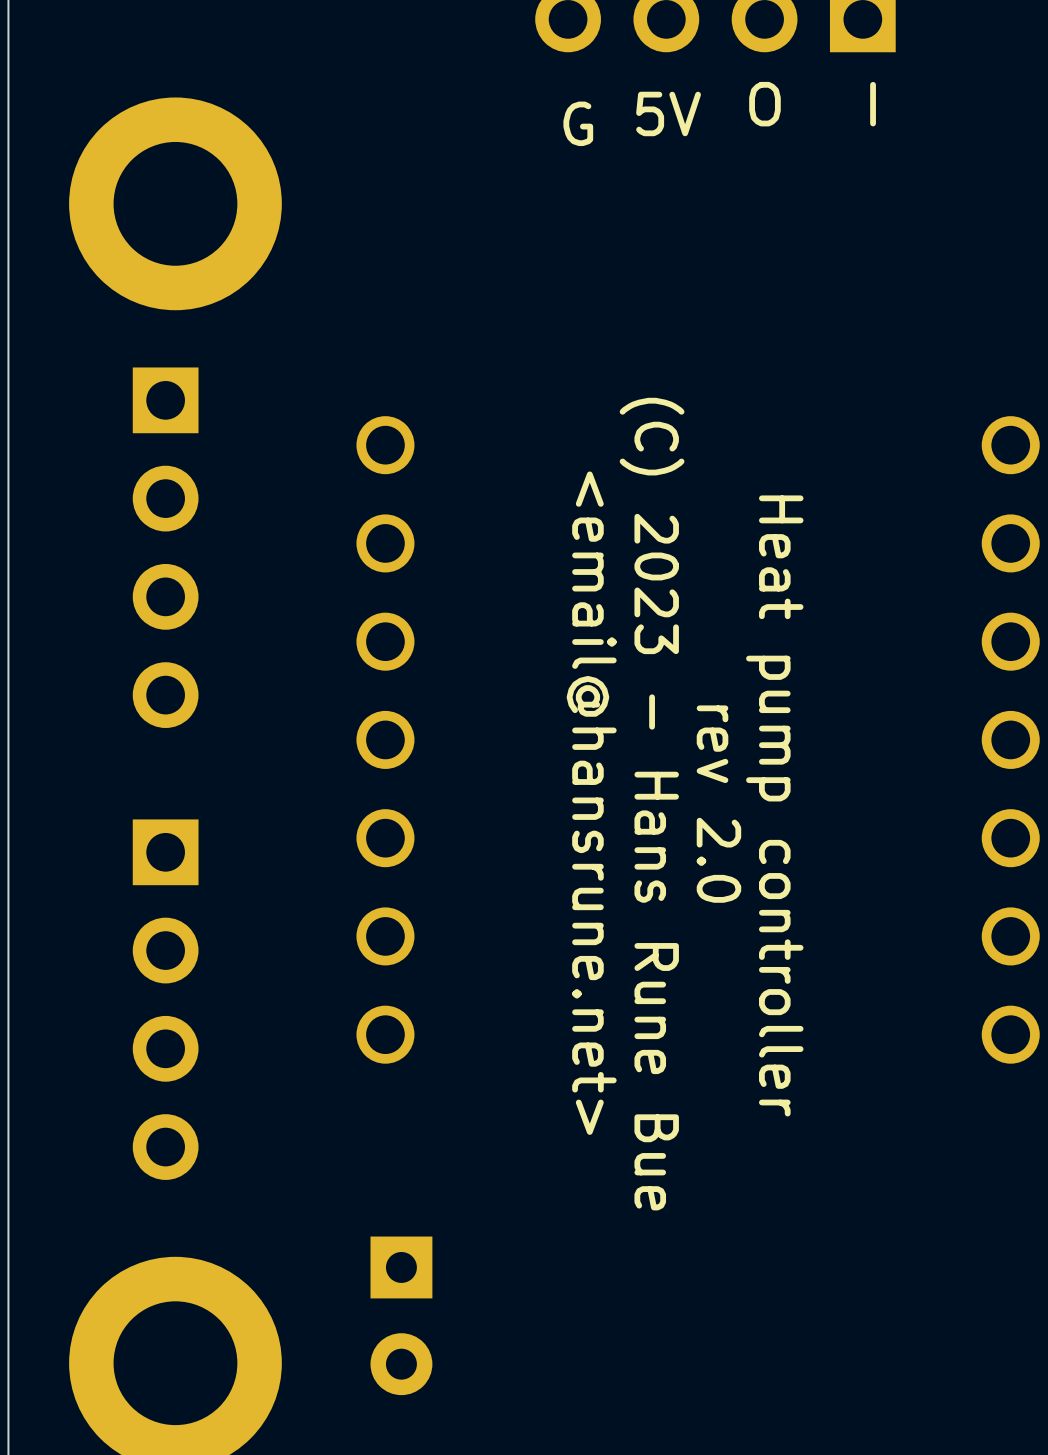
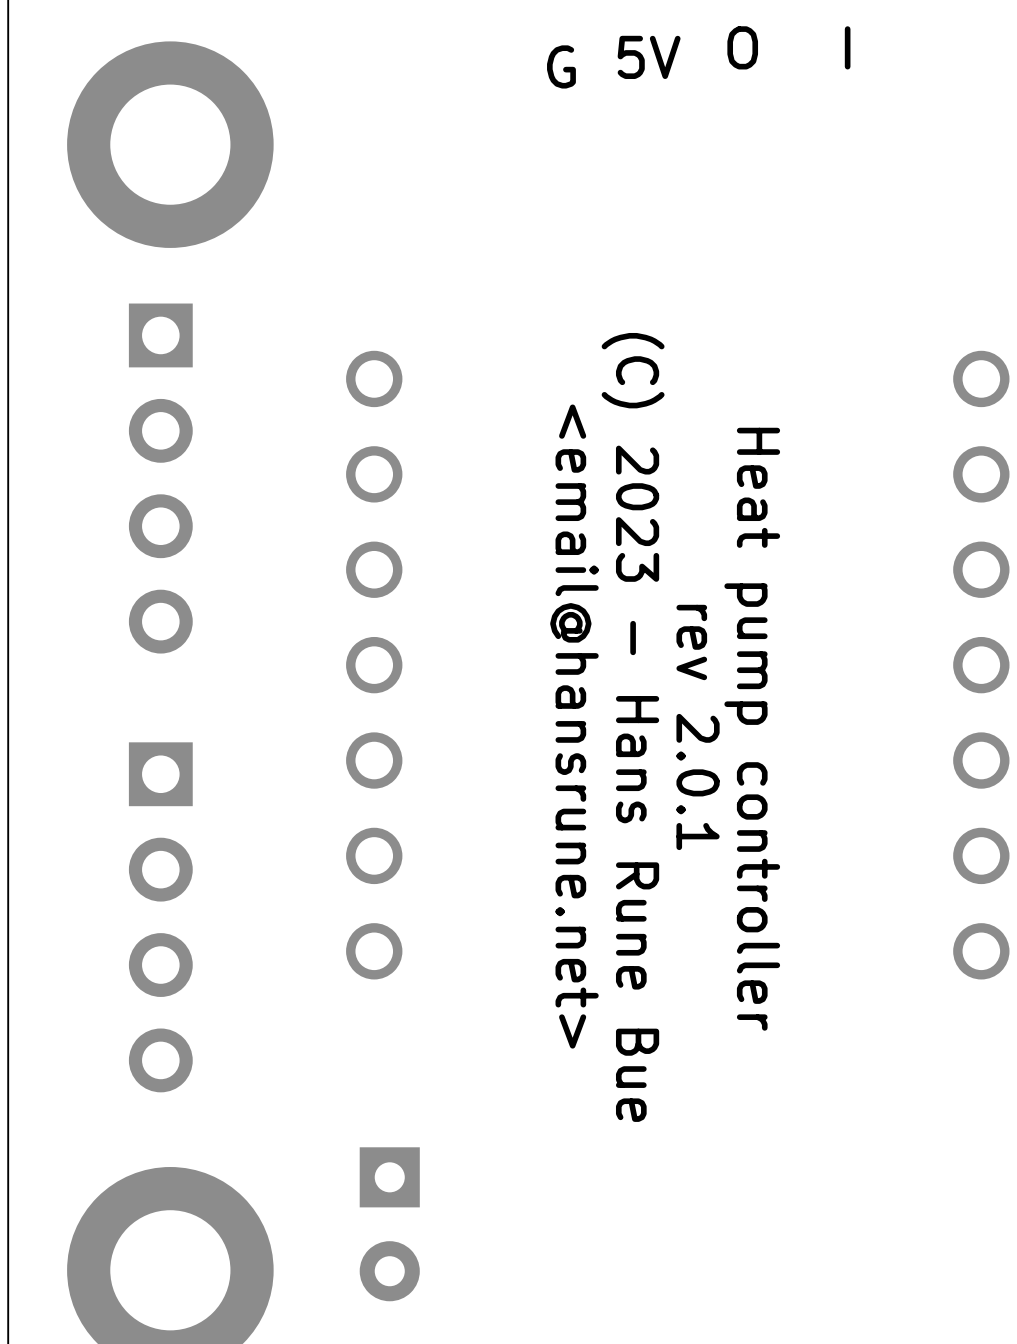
text: rev 2.0 (718, 804) -> rev 2.0.1 (698, 727)

